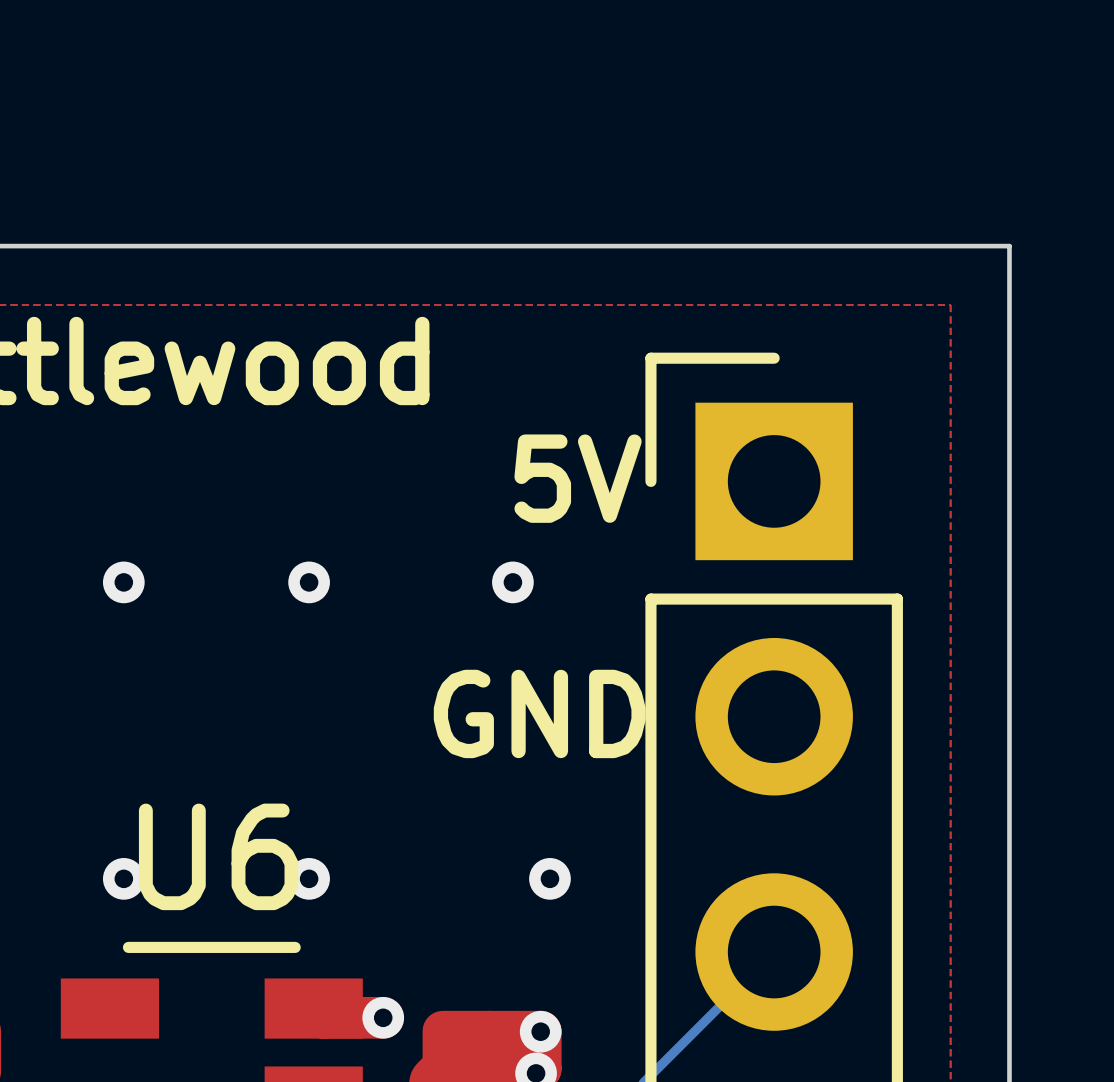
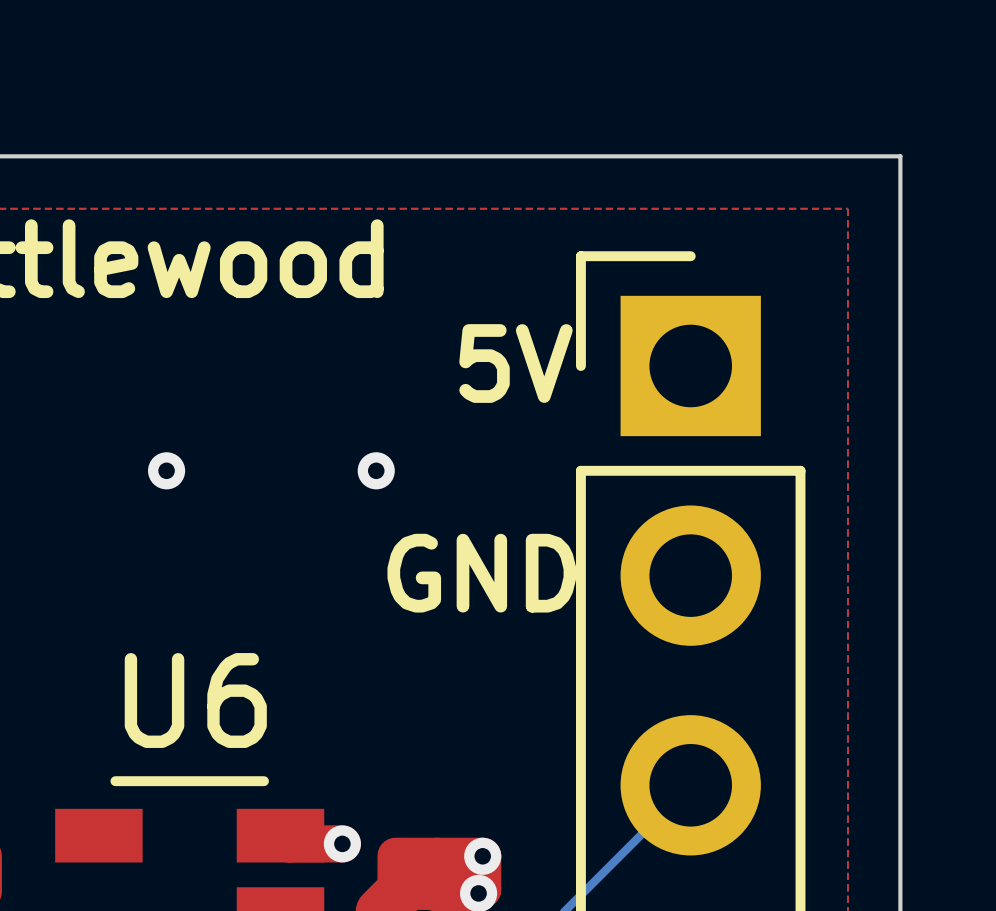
via: (123, 582) -> none
via: (309, 582) -> none
via: (512, 582) -> none
via: none -> (166, 470)
via: none -> (376, 470)
via: (123, 878) -> none
via: (309, 878) -> none
via: (549, 878) -> none

